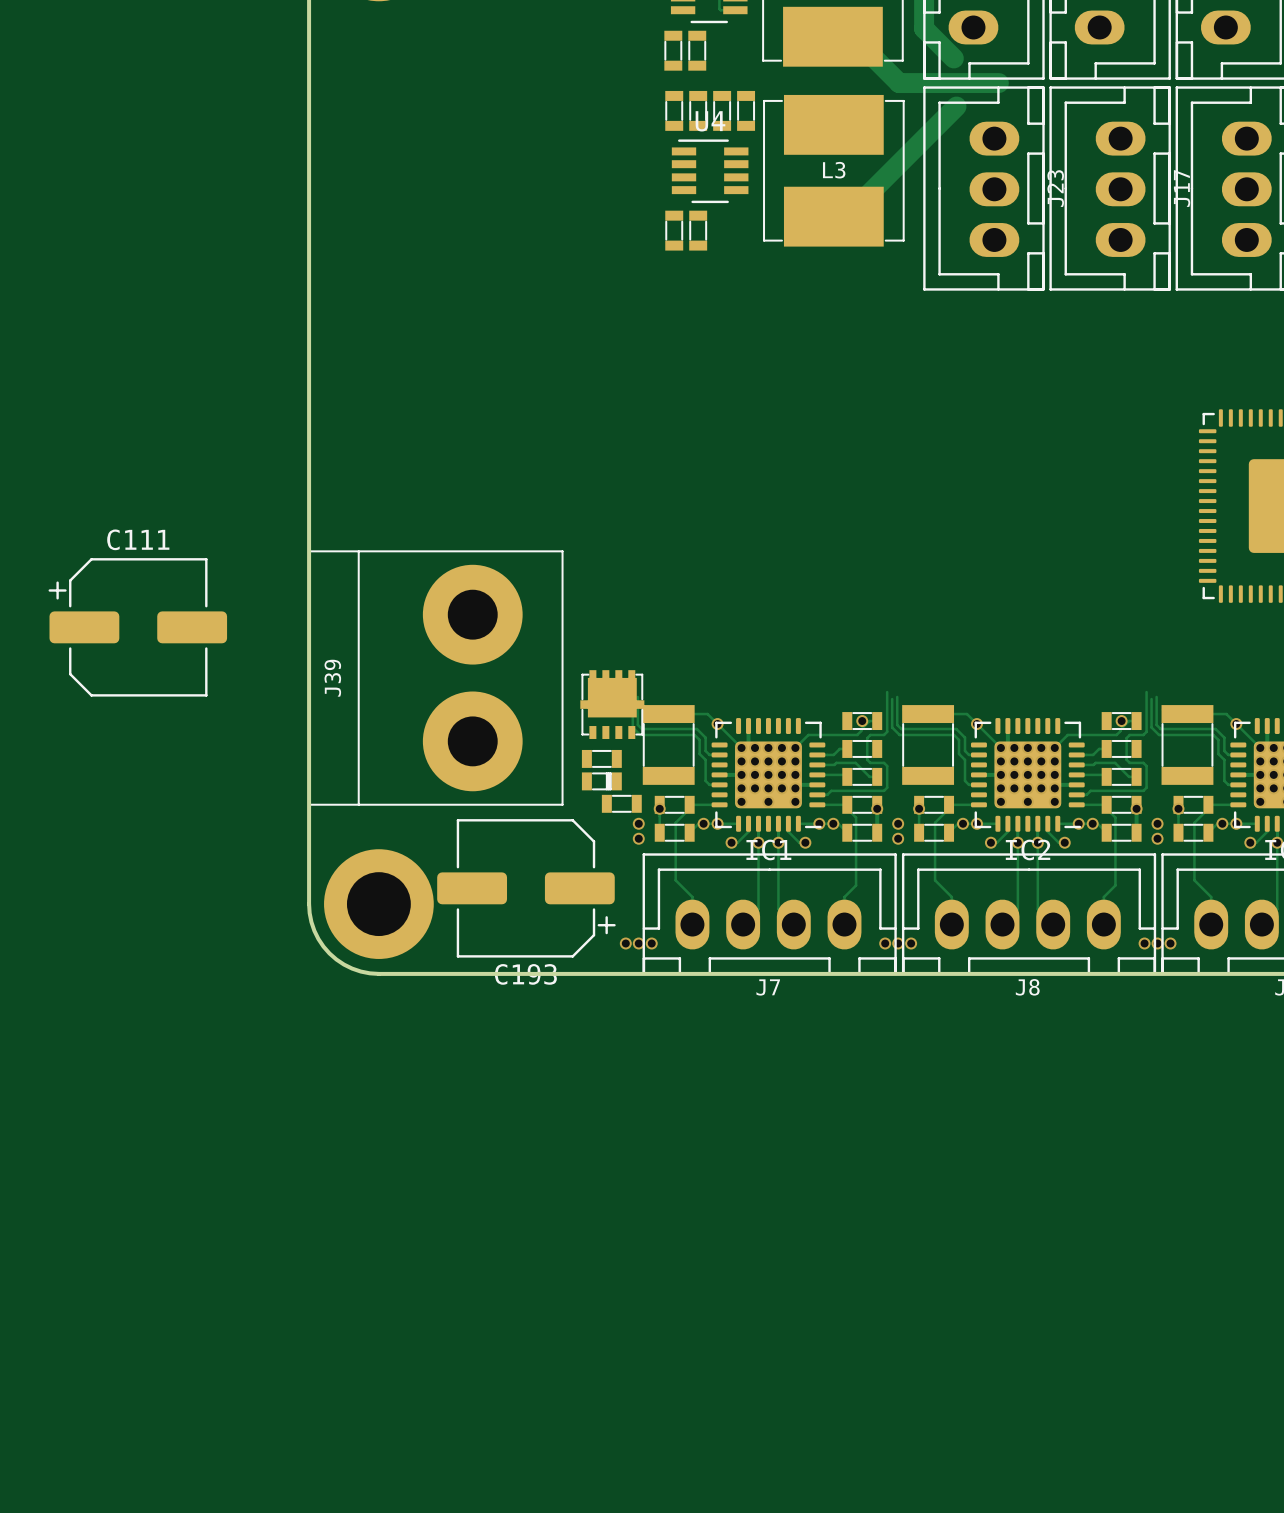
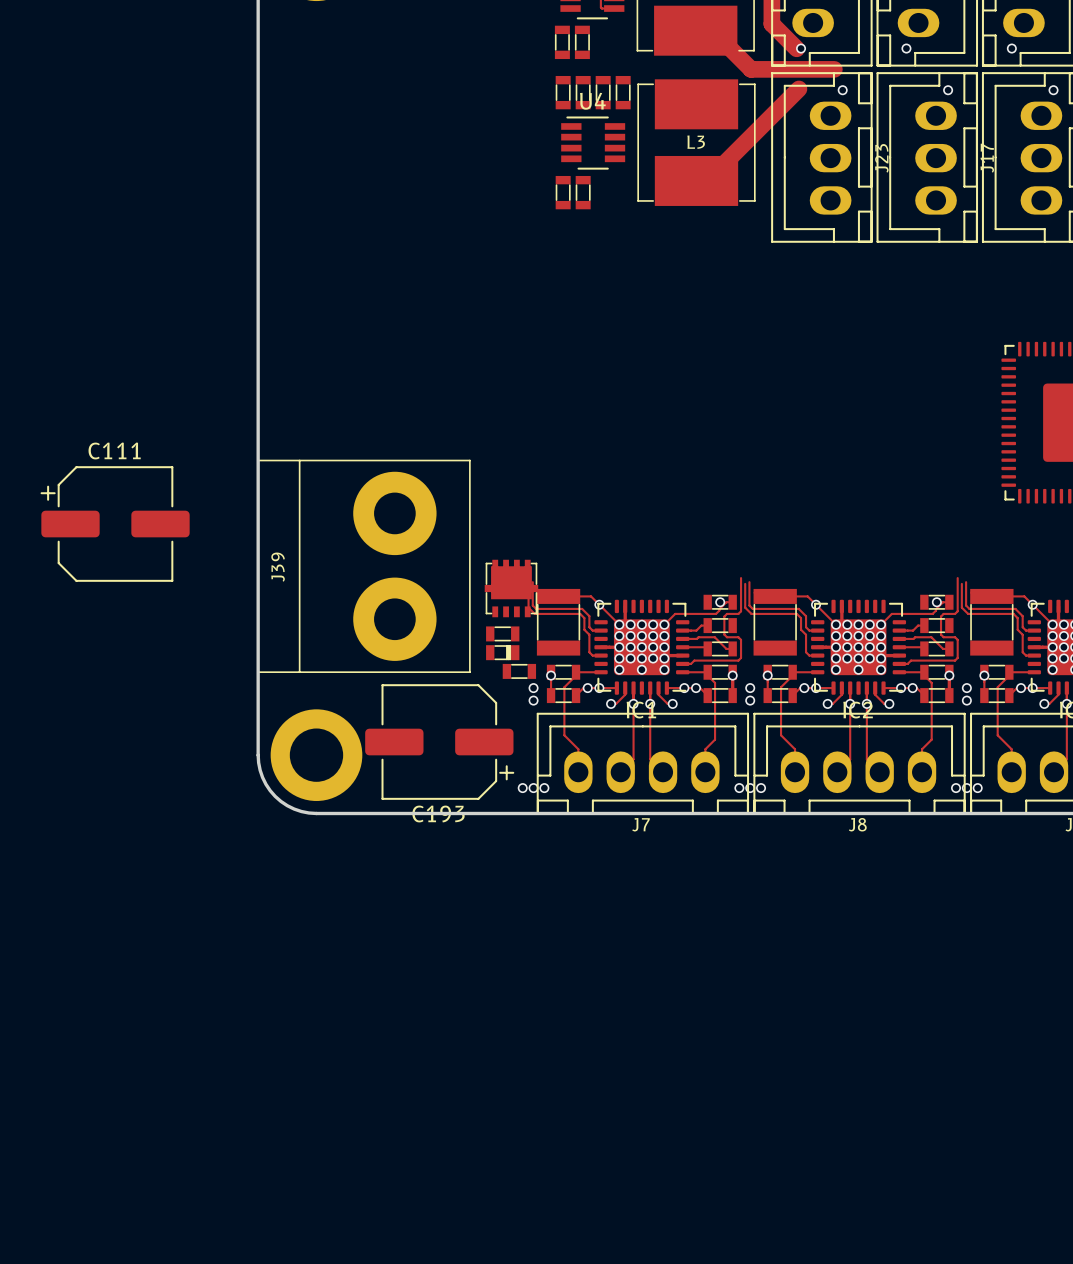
via: none -> (801, 48)
via: none -> (906, 48)
via: none -> (1011, 48)
via: none -> (842, 90)
via: none -> (948, 90)
via: none -> (1053, 90)

